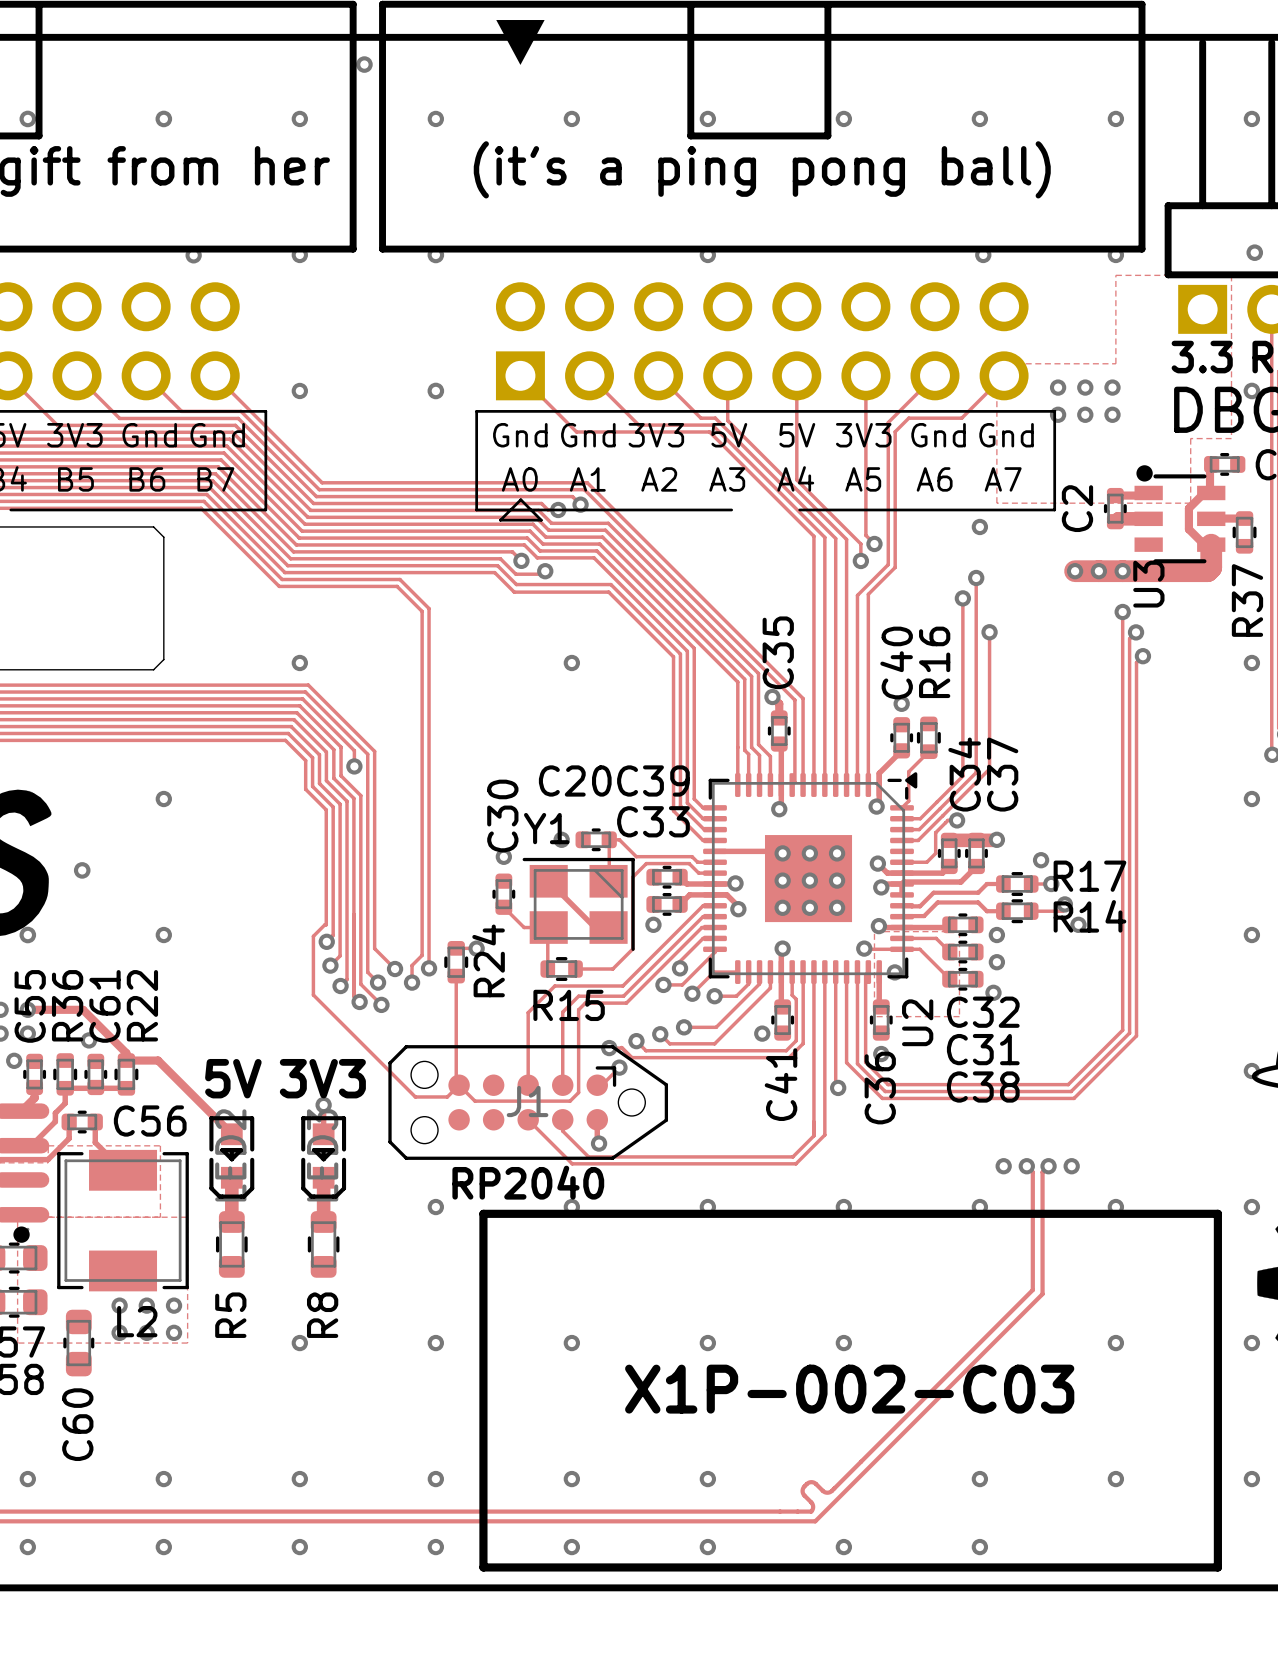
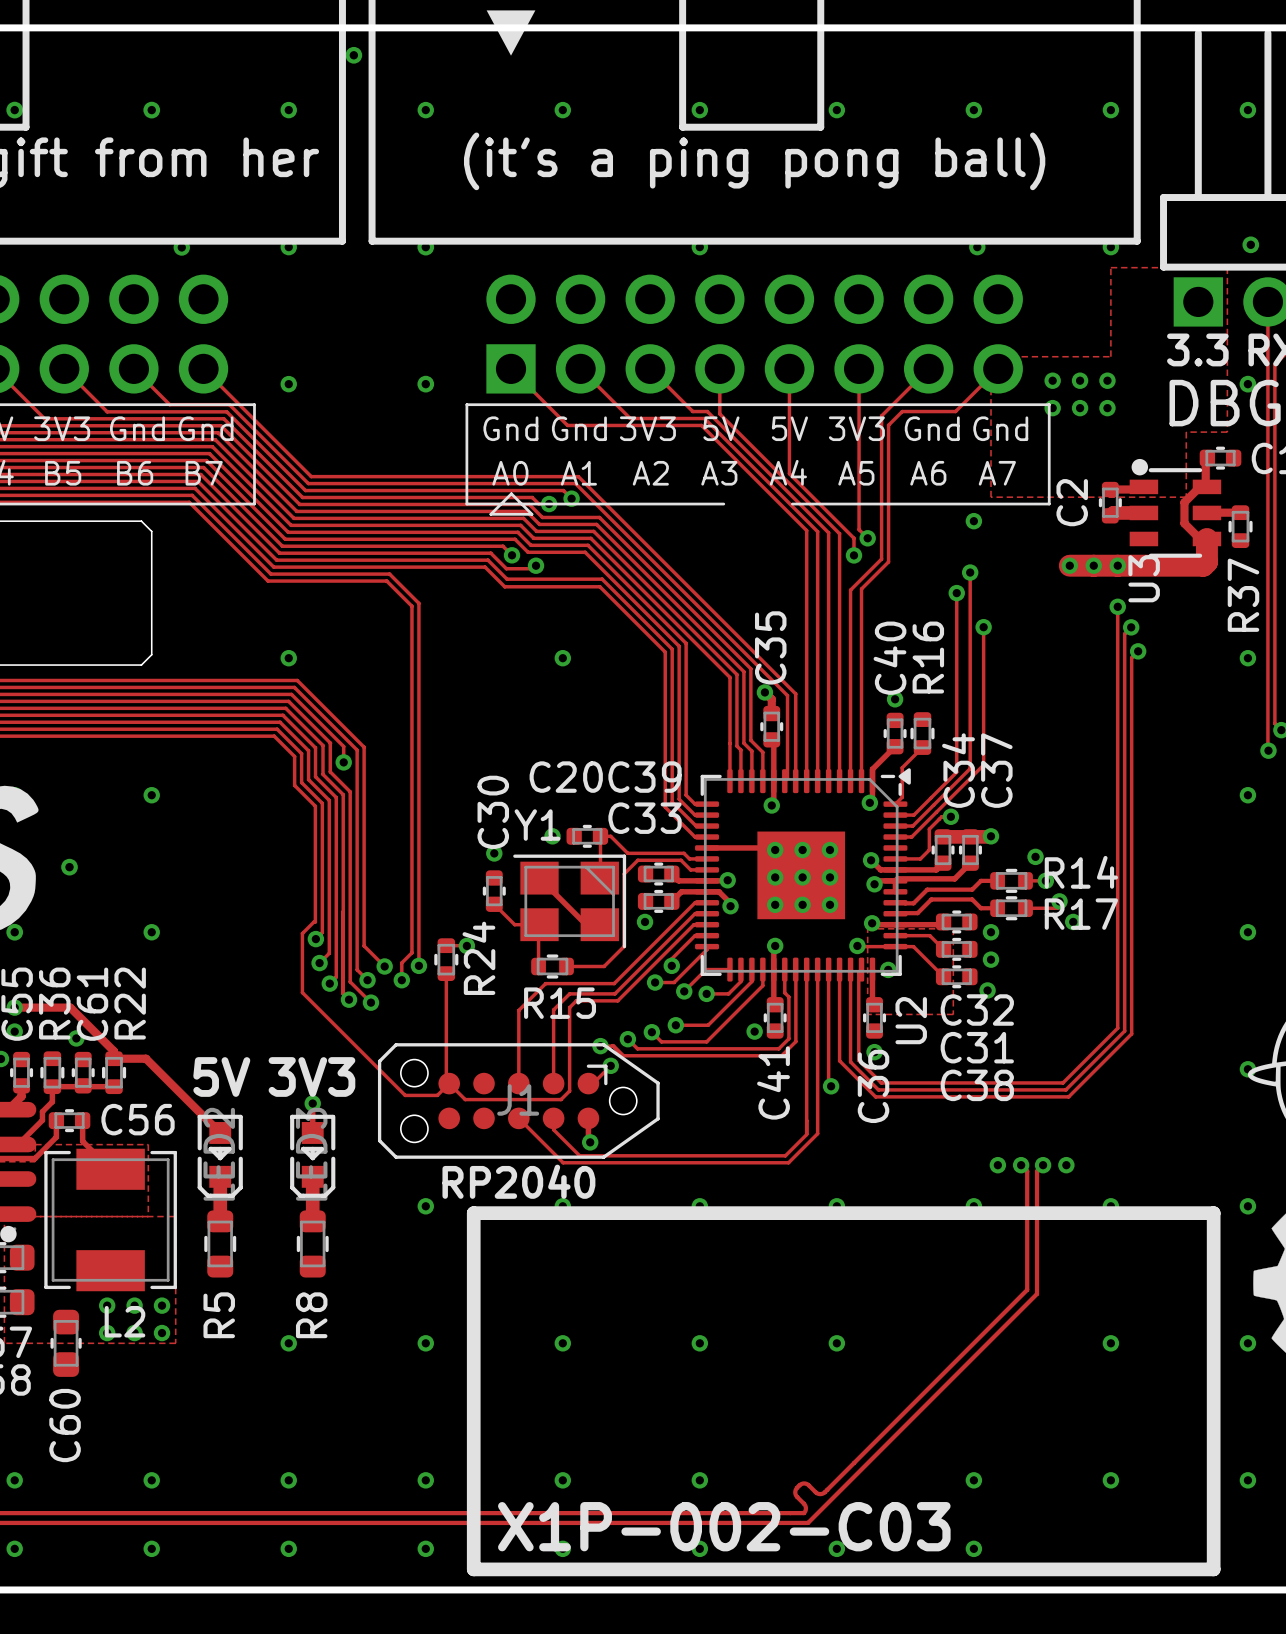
R17 name position: R17 (1089, 876) -> R17 (1081, 914)
R14 name position: R14 (1089, 916) -> R14 (1081, 872)
line width: thin (483, 1213) (1217, 1213) (1217, 1567) (483, 1567) (483, 1213) -> thick (473, 1213) (1213, 1213) (1213, 1569) (473, 1569) (473, 1213)
text position: X1P-002-C03 (849, 1389) -> X1P-002-C03 (724, 1526)

